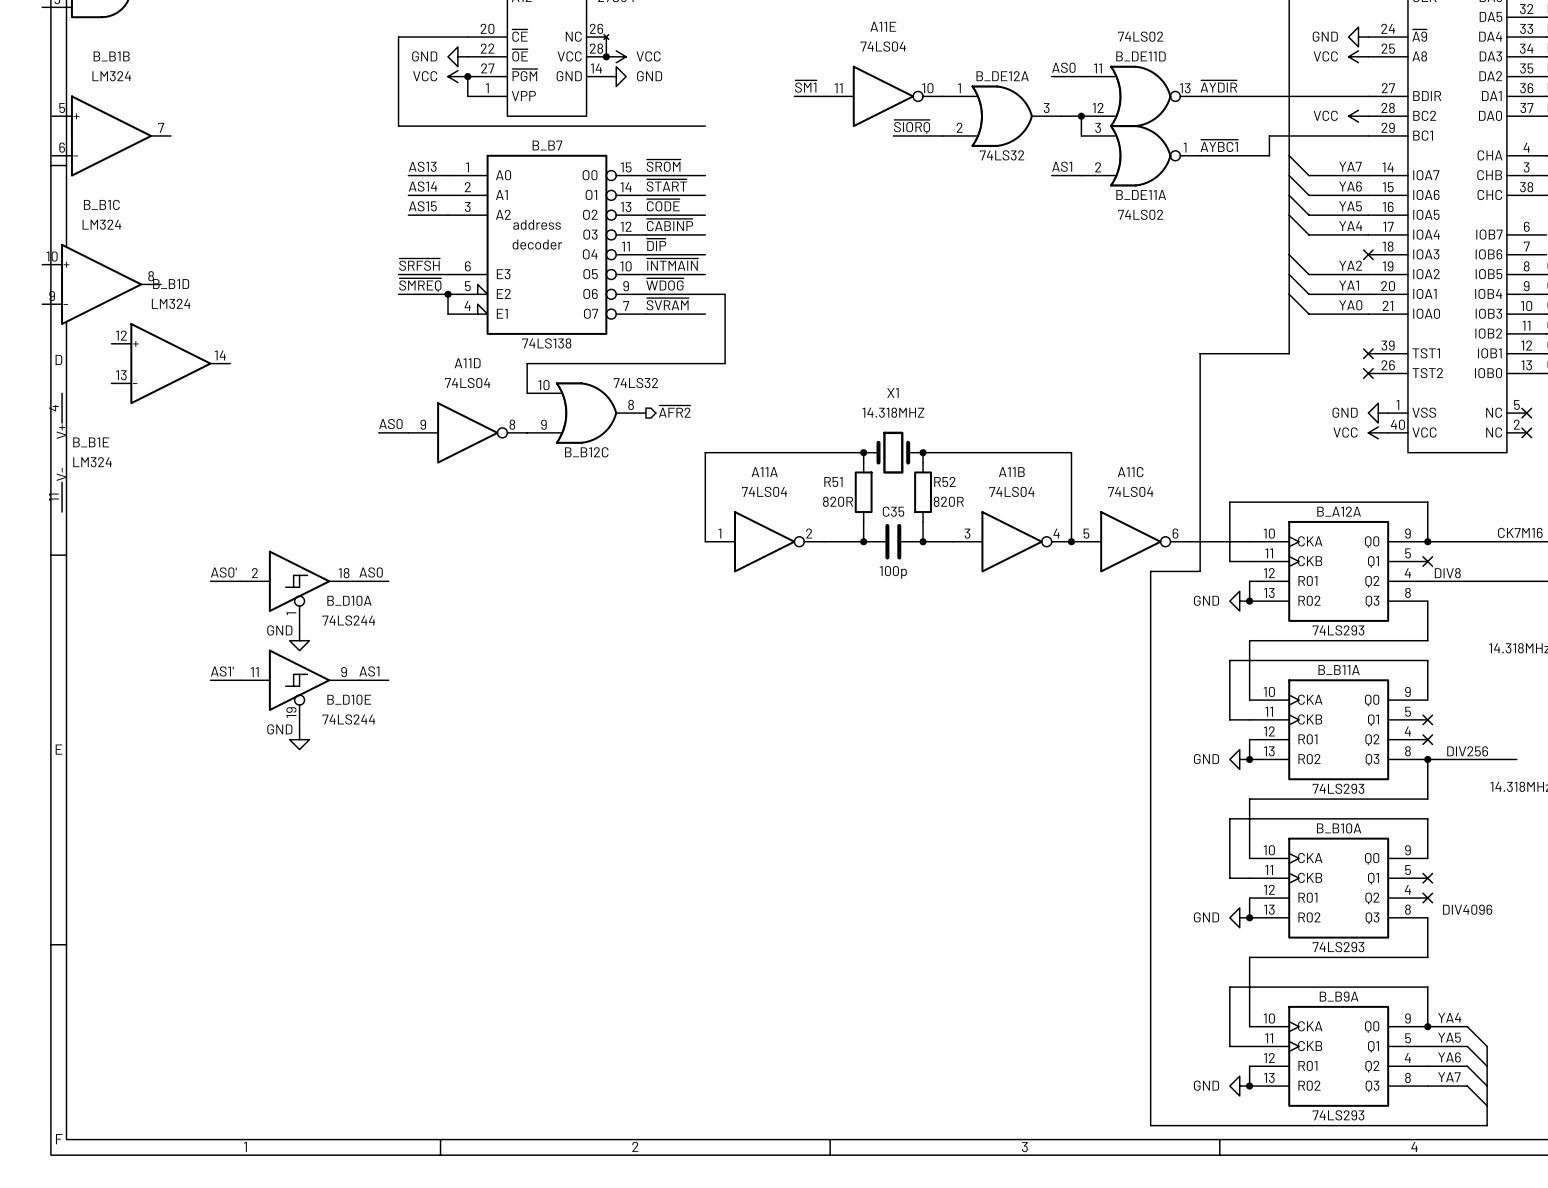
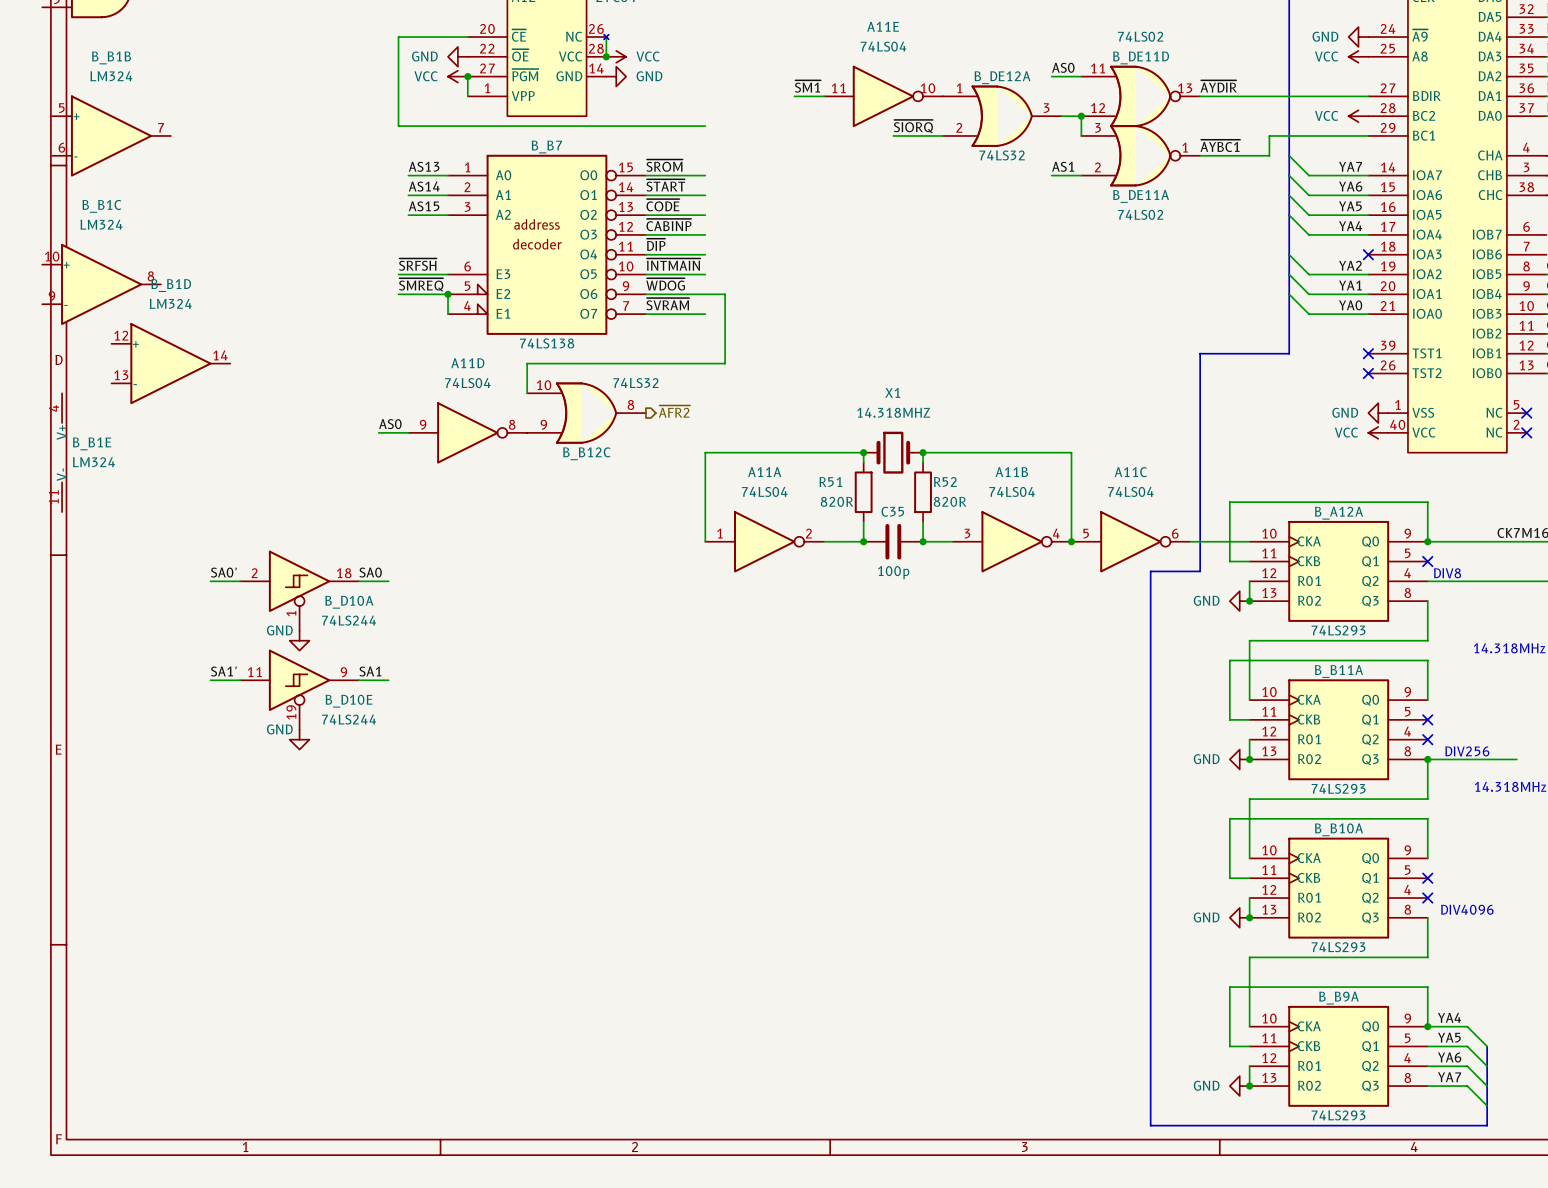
label: AS0' (223, 572) -> SA0' (223, 572)
label: AS0 (371, 572) -> SA0 (370, 572)
label: AS1' (222, 671) -> SA1' (223, 671)
label: AS1 (369, 671) -> SA1 (370, 671)

